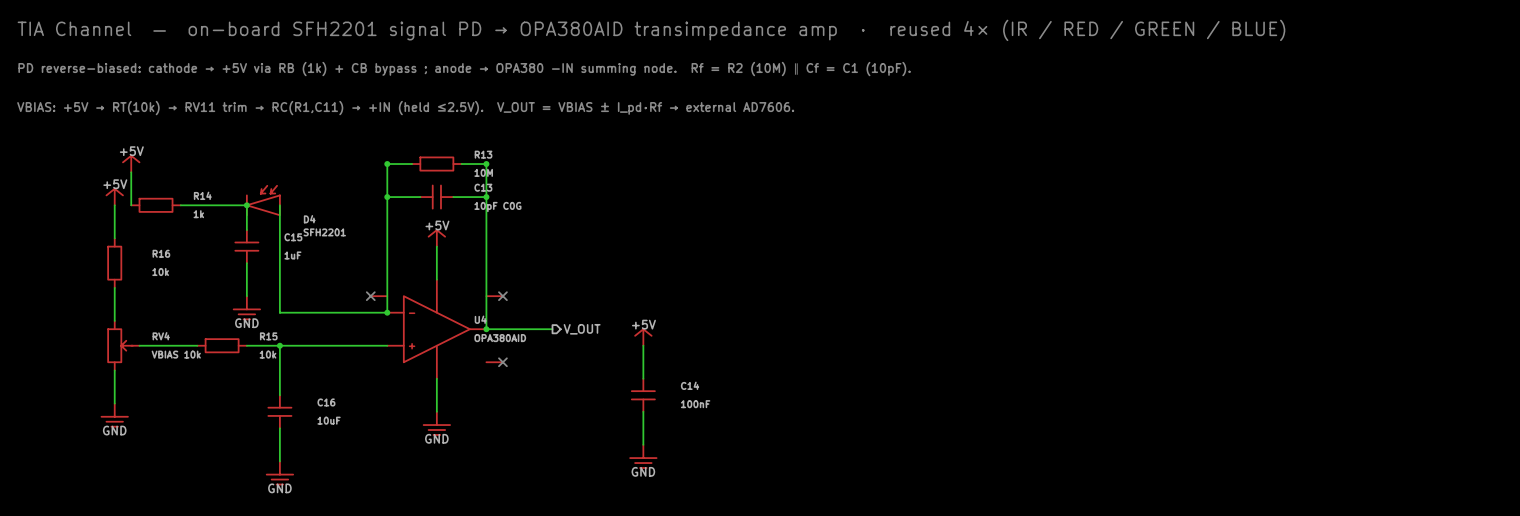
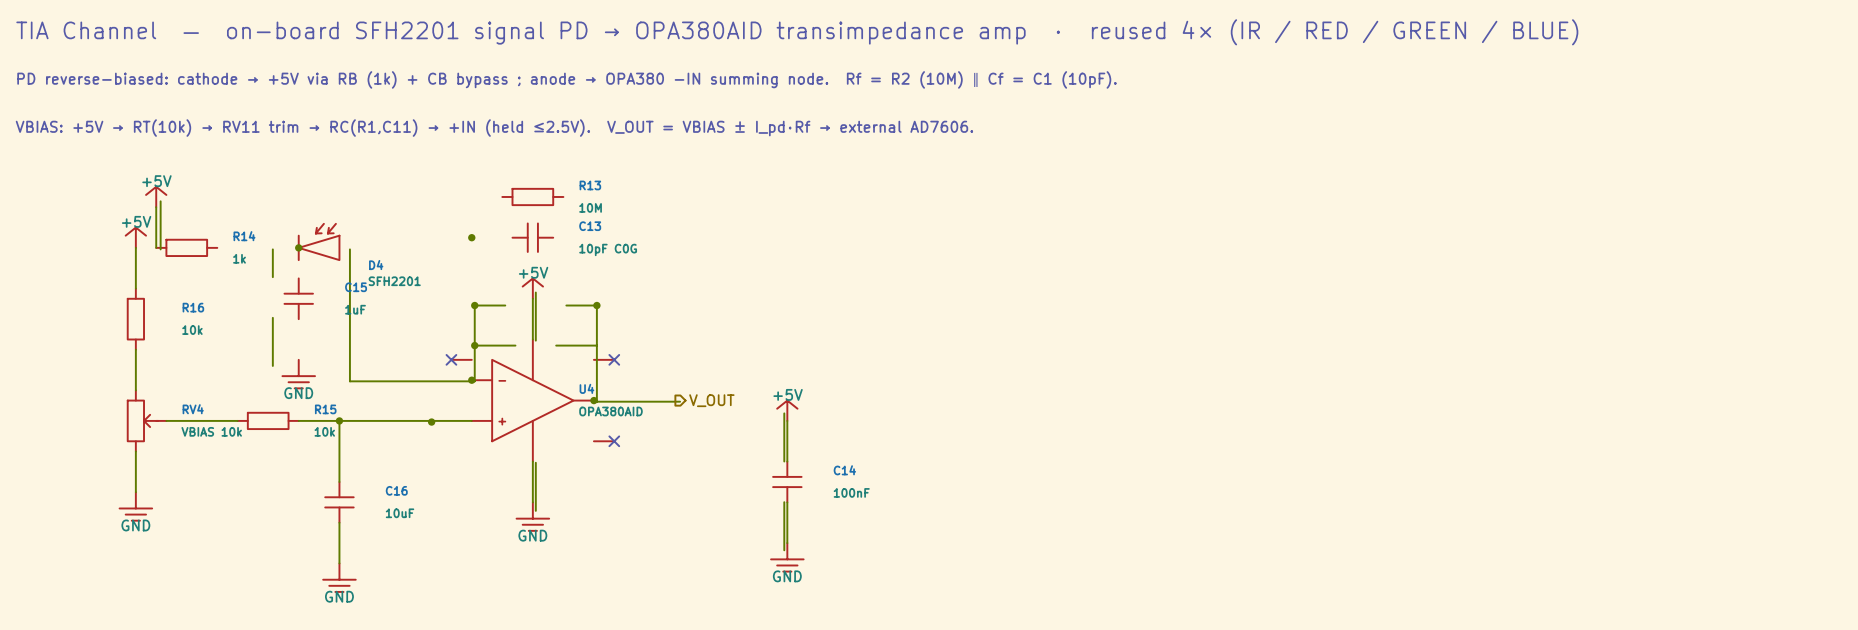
junction: (387, 164) -> none
wire: (412, 164) (387, 164) (387, 312) (279, 312) (279, 205) -> none
wire: (461, 164) (486, 164) (486, 329) (552, 329) -> none
junction: (486, 164) -> none
wire: none -> (160, 201) (160, 249)
wire: (387, 197) (420, 197) -> (474, 345) (515, 345)
wire: (453, 197) (486, 197) -> (556, 345) (596, 345)
junction: (486, 197) -> none
wire: (180, 205) (246, 205) (246, 230) -> none
wire: none -> (272, 249) (272, 277)
wire: none -> (349, 249) (349, 381) (474, 381) (474, 305) (505, 305)
wire: none -> (535, 292) (535, 340)
junction: none -> (474, 305)
wire: none -> (566, 305) (596, 305) (596, 401) (680, 401)
junction: none -> (596, 305)
wire: none -> (272, 317) (272, 365)
wire: (246, 263) (246, 296) -> none
junction: none -> (474, 345)
wire: none -> (784, 413) (784, 461)
junction: none -> (431, 422)
wire: none -> (535, 462) (535, 510)
wire: none -> (784, 502) (784, 550)

